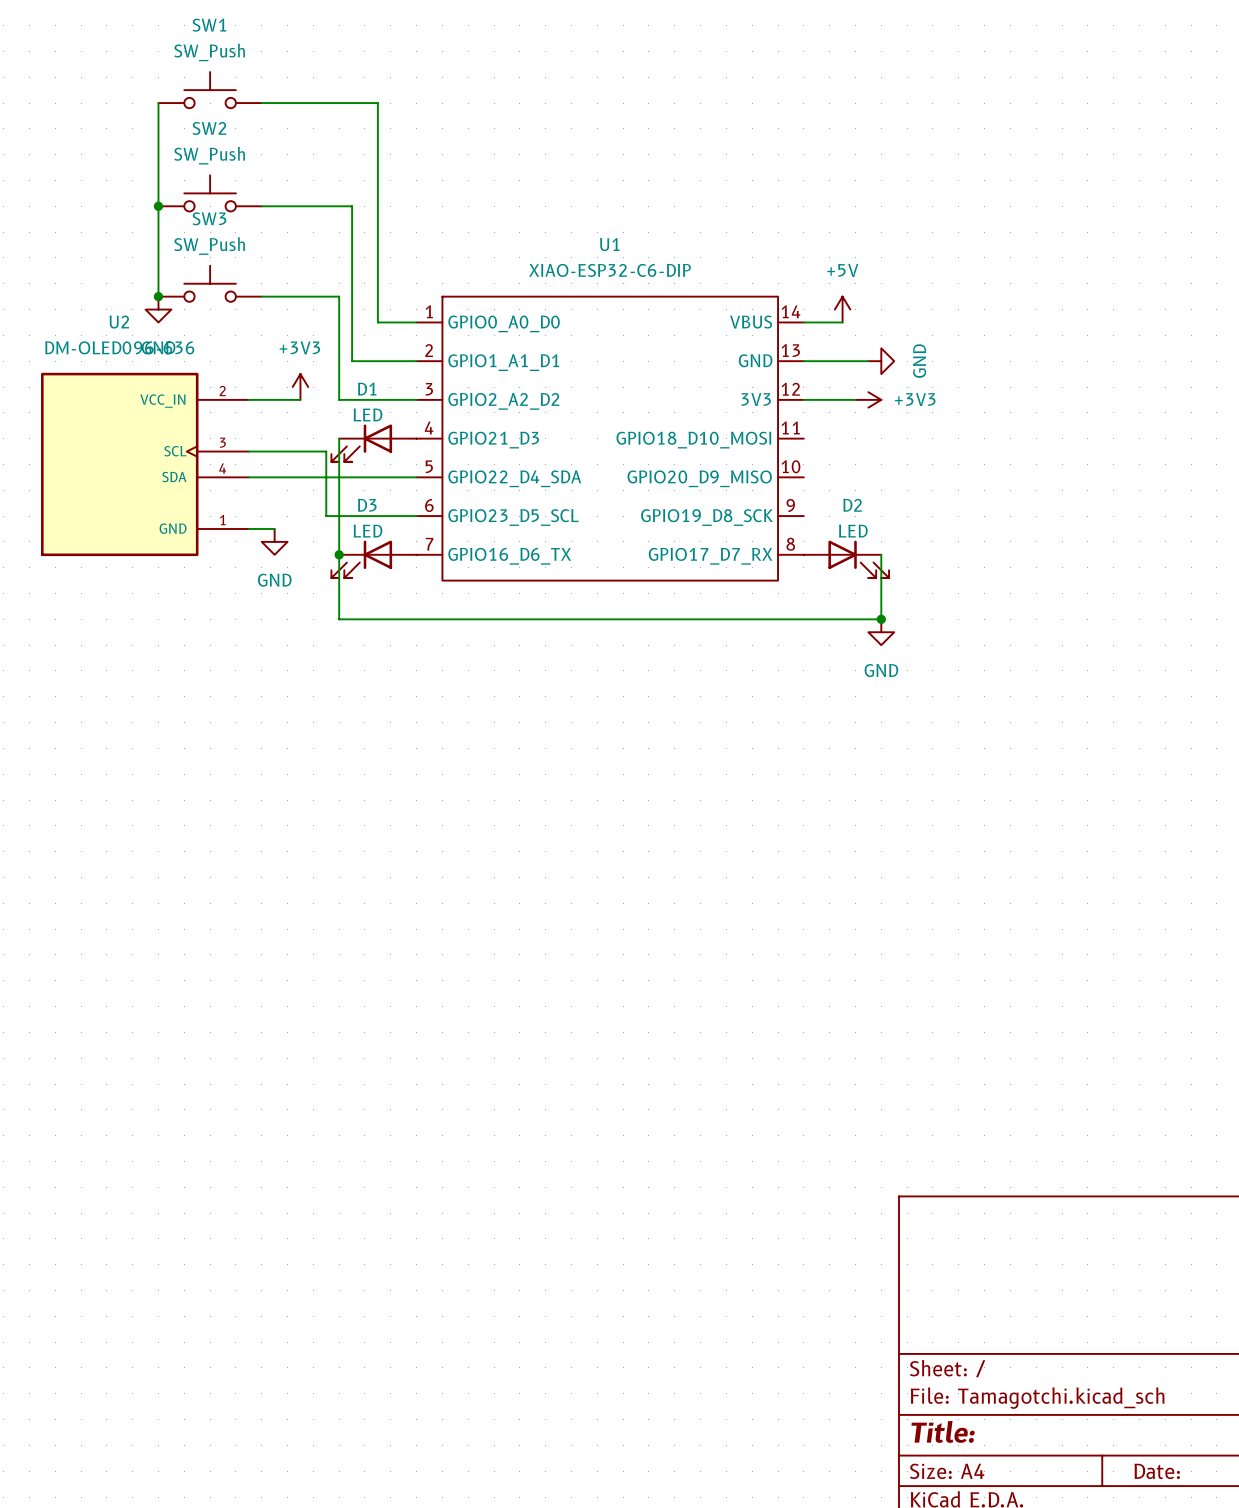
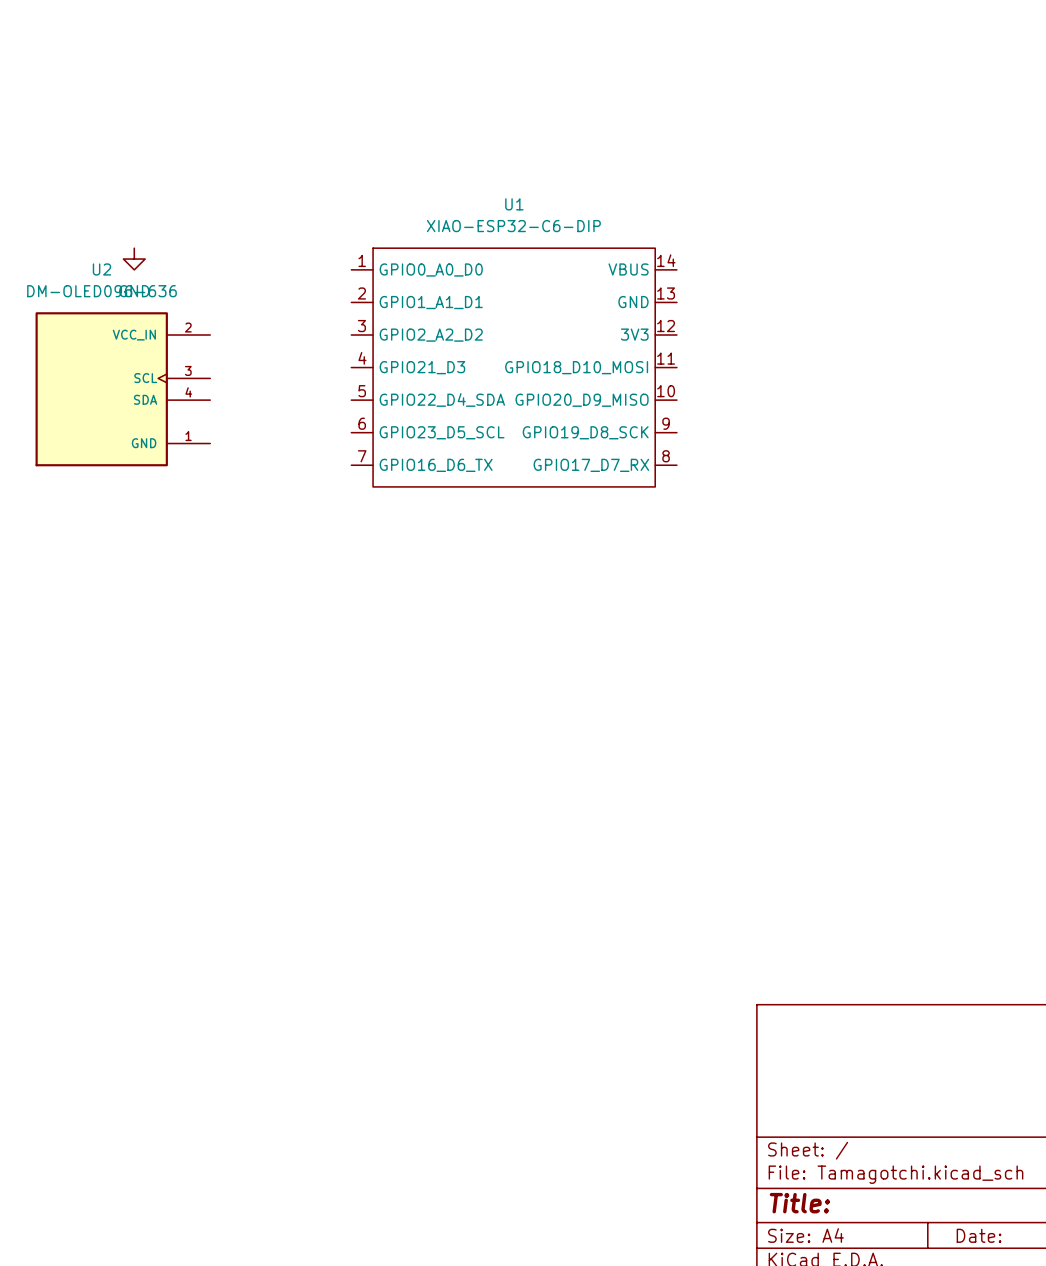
SW1: SW_Push (210, 90) -> none
wire: (158, 103) (158, 296) -> none
wire: (261, 103) (377, 103) (377, 322) (416, 322) -> none
SW2: SW_Push (210, 193) -> none
junction: (158, 206) -> none
wire: (261, 206) (352, 206) (352, 361) (416, 361) -> none
SW3: SW_Push (210, 283) -> none
junction: (158, 296) -> none
wire: (261, 296) (339, 296) (339, 399) (416, 399) -> none
power symbol: +5V (842, 309) -> none
wire: (803, 322) (842, 322) -> none
wire: (803, 361) (868, 361) -> none
power symbol: GND (881, 361) -> none
power symbol: +3V3 (300, 387) -> none
wire: (248, 399) (300, 399) -> none
wire: (803, 399) (855, 399) -> none
power symbol: +3V3 (868, 399) -> none
wire: (339, 438) (339, 619) (881, 619) (881, 554) -> none
D1: LED (374, 443) -> none
wire: (248, 451) (326, 451) (326, 516) (416, 516) -> none
wire: (248, 477) (416, 477) -> none
wire: (248, 528) (274, 528) -> none
power symbol: GND (274, 541) -> none
junction: (339, 554) -> none
D3: LED (374, 559) -> none
D2: LED (846, 559) -> none
junction: (881, 619) -> none
power symbol: GND (881, 632) -> none

